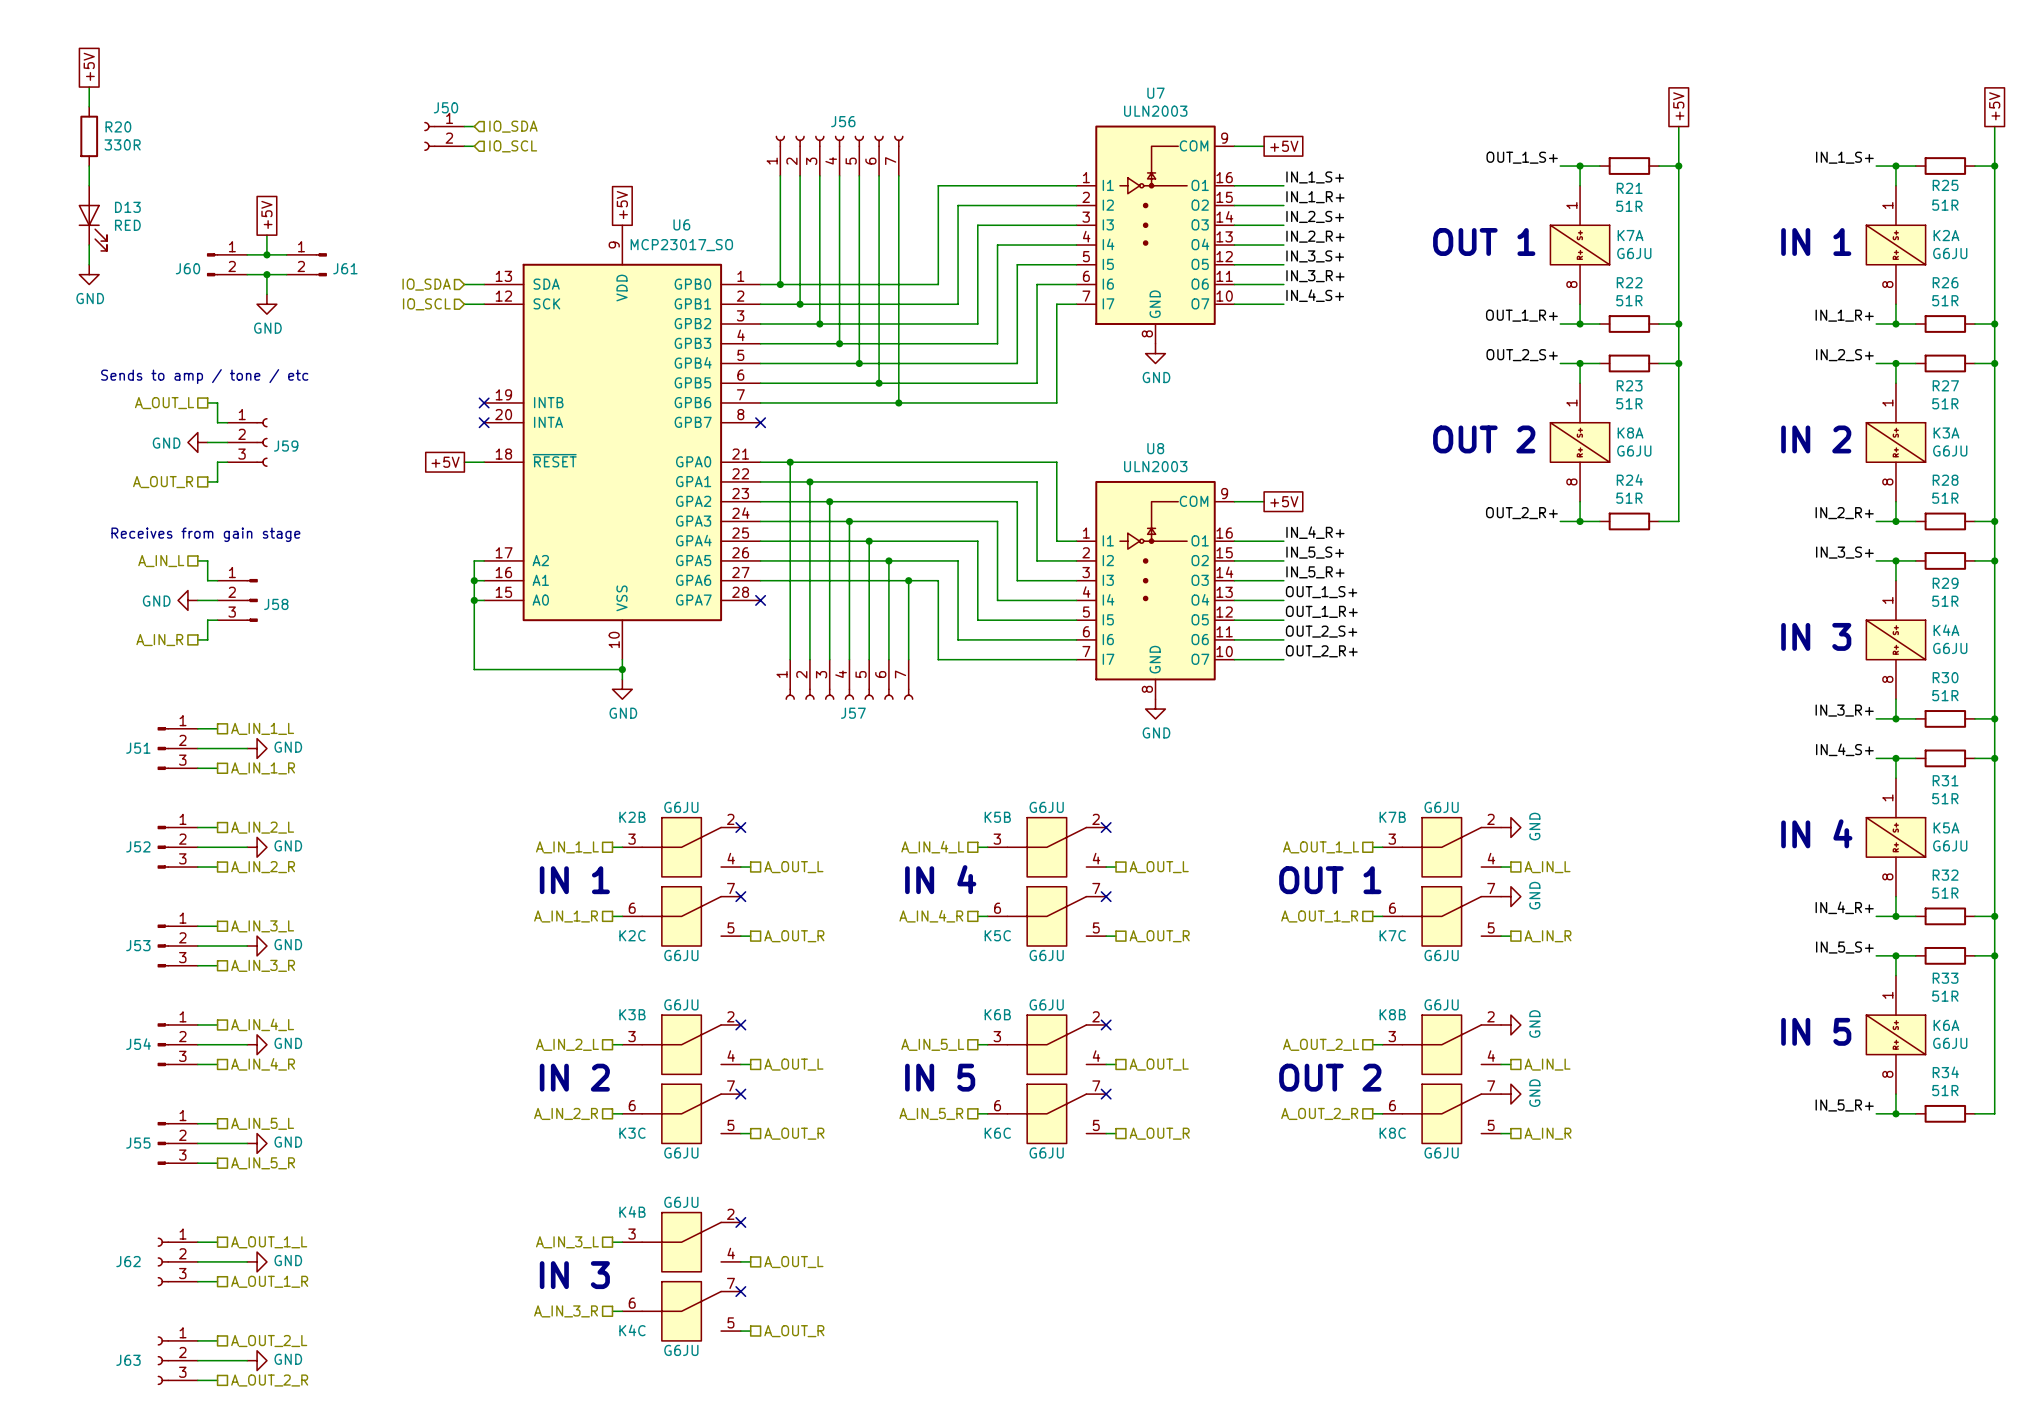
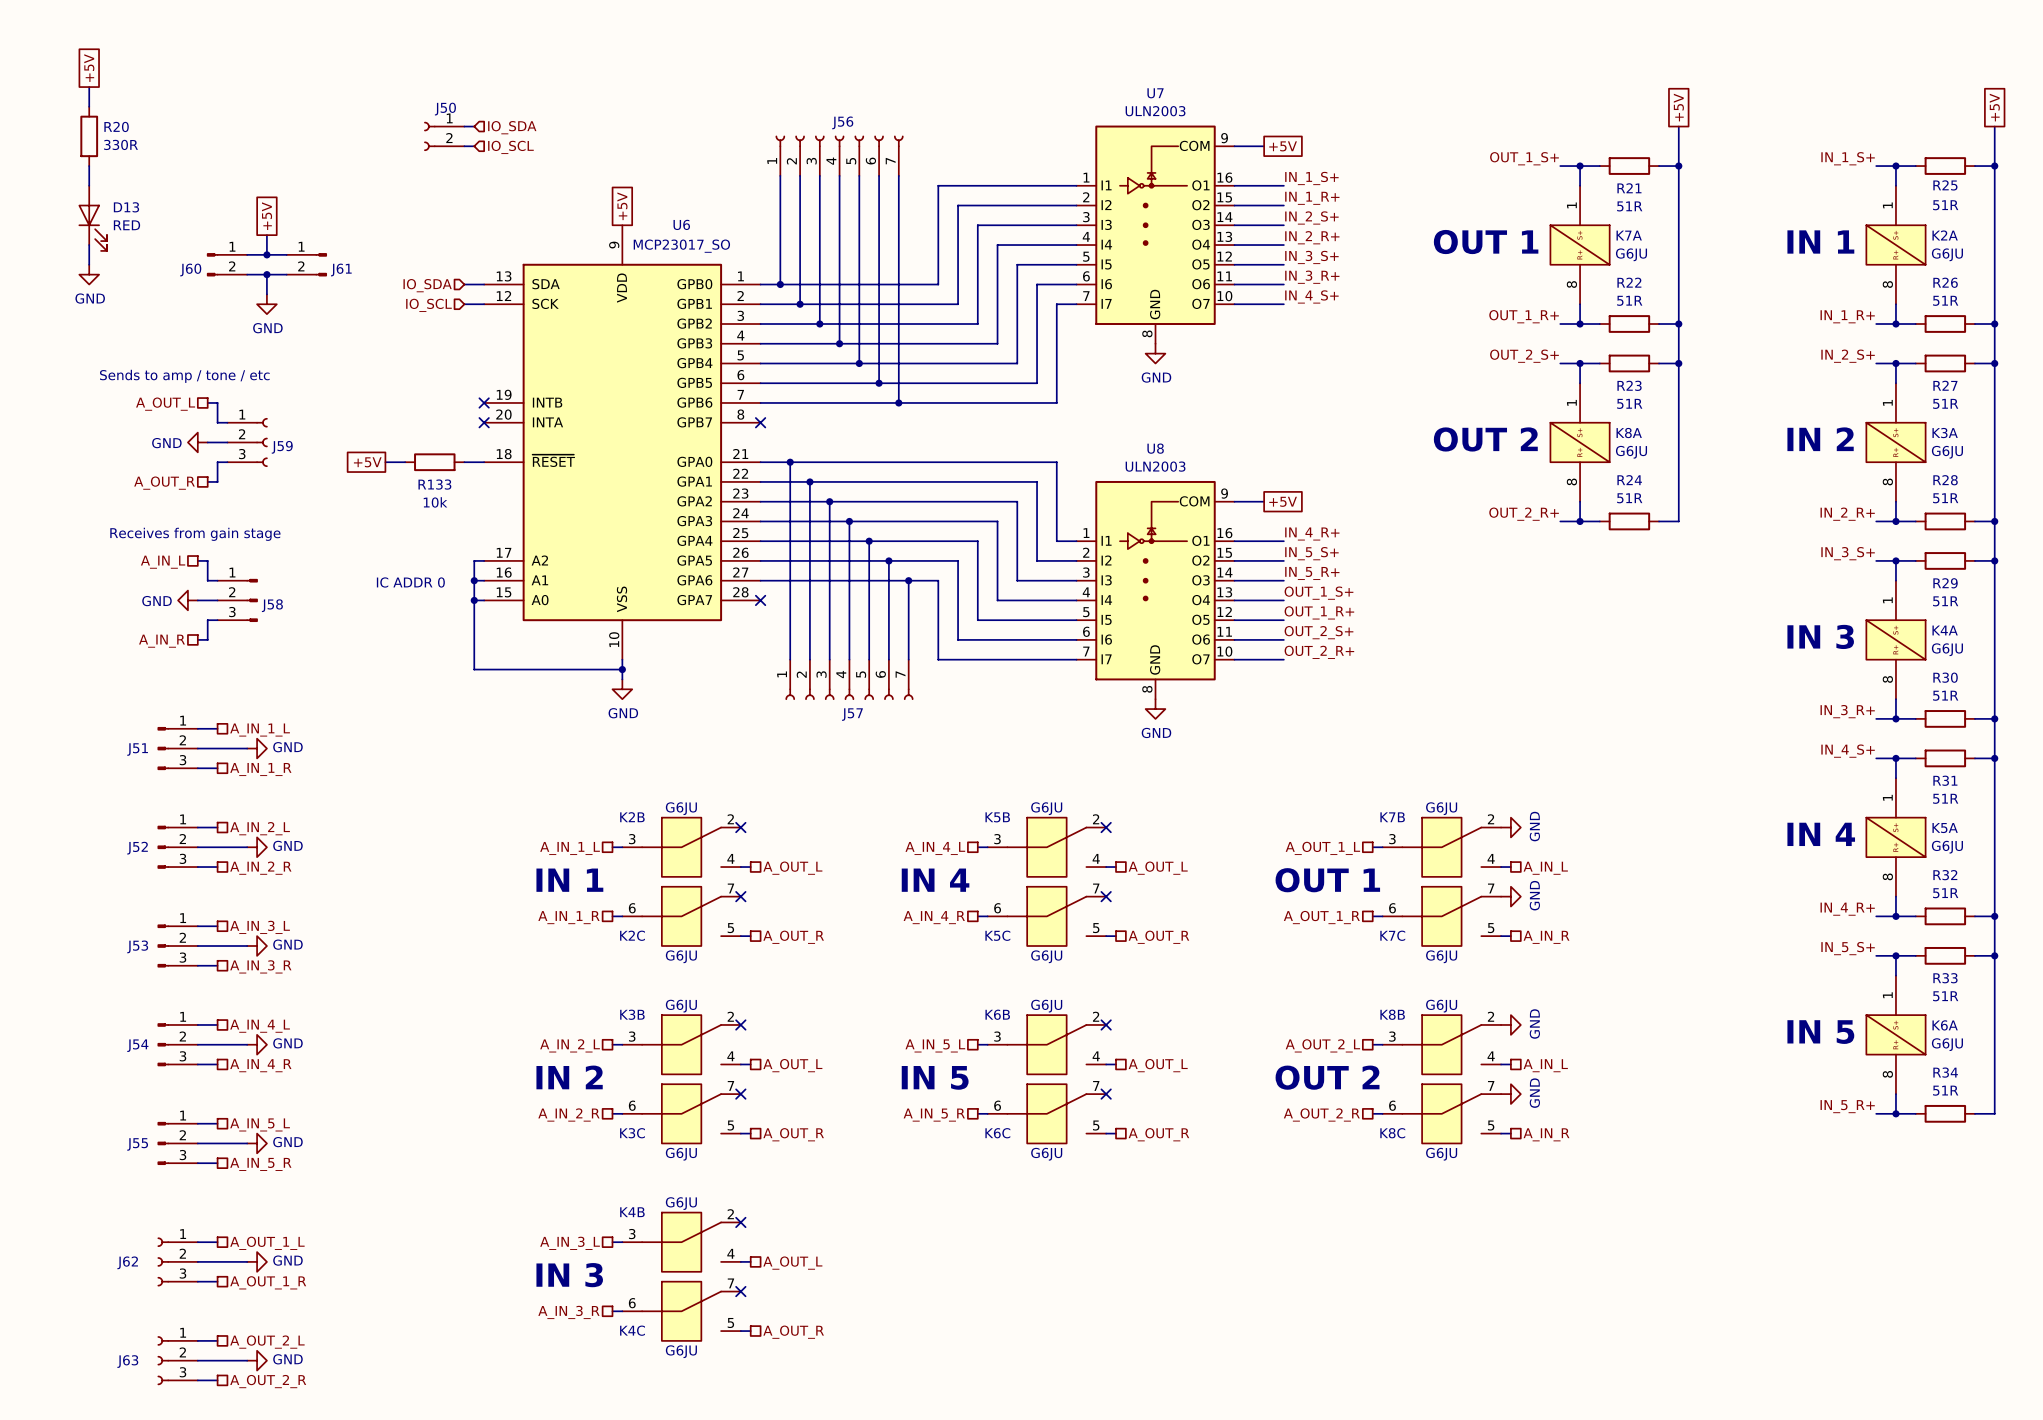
wire: none -> (385, 462) (405, 462)
R133: none -> 10k (434, 462)
global label position: +5V (445, 462) -> +5V (367, 462)
text: none -> IC ADDR 0 (410, 582)

